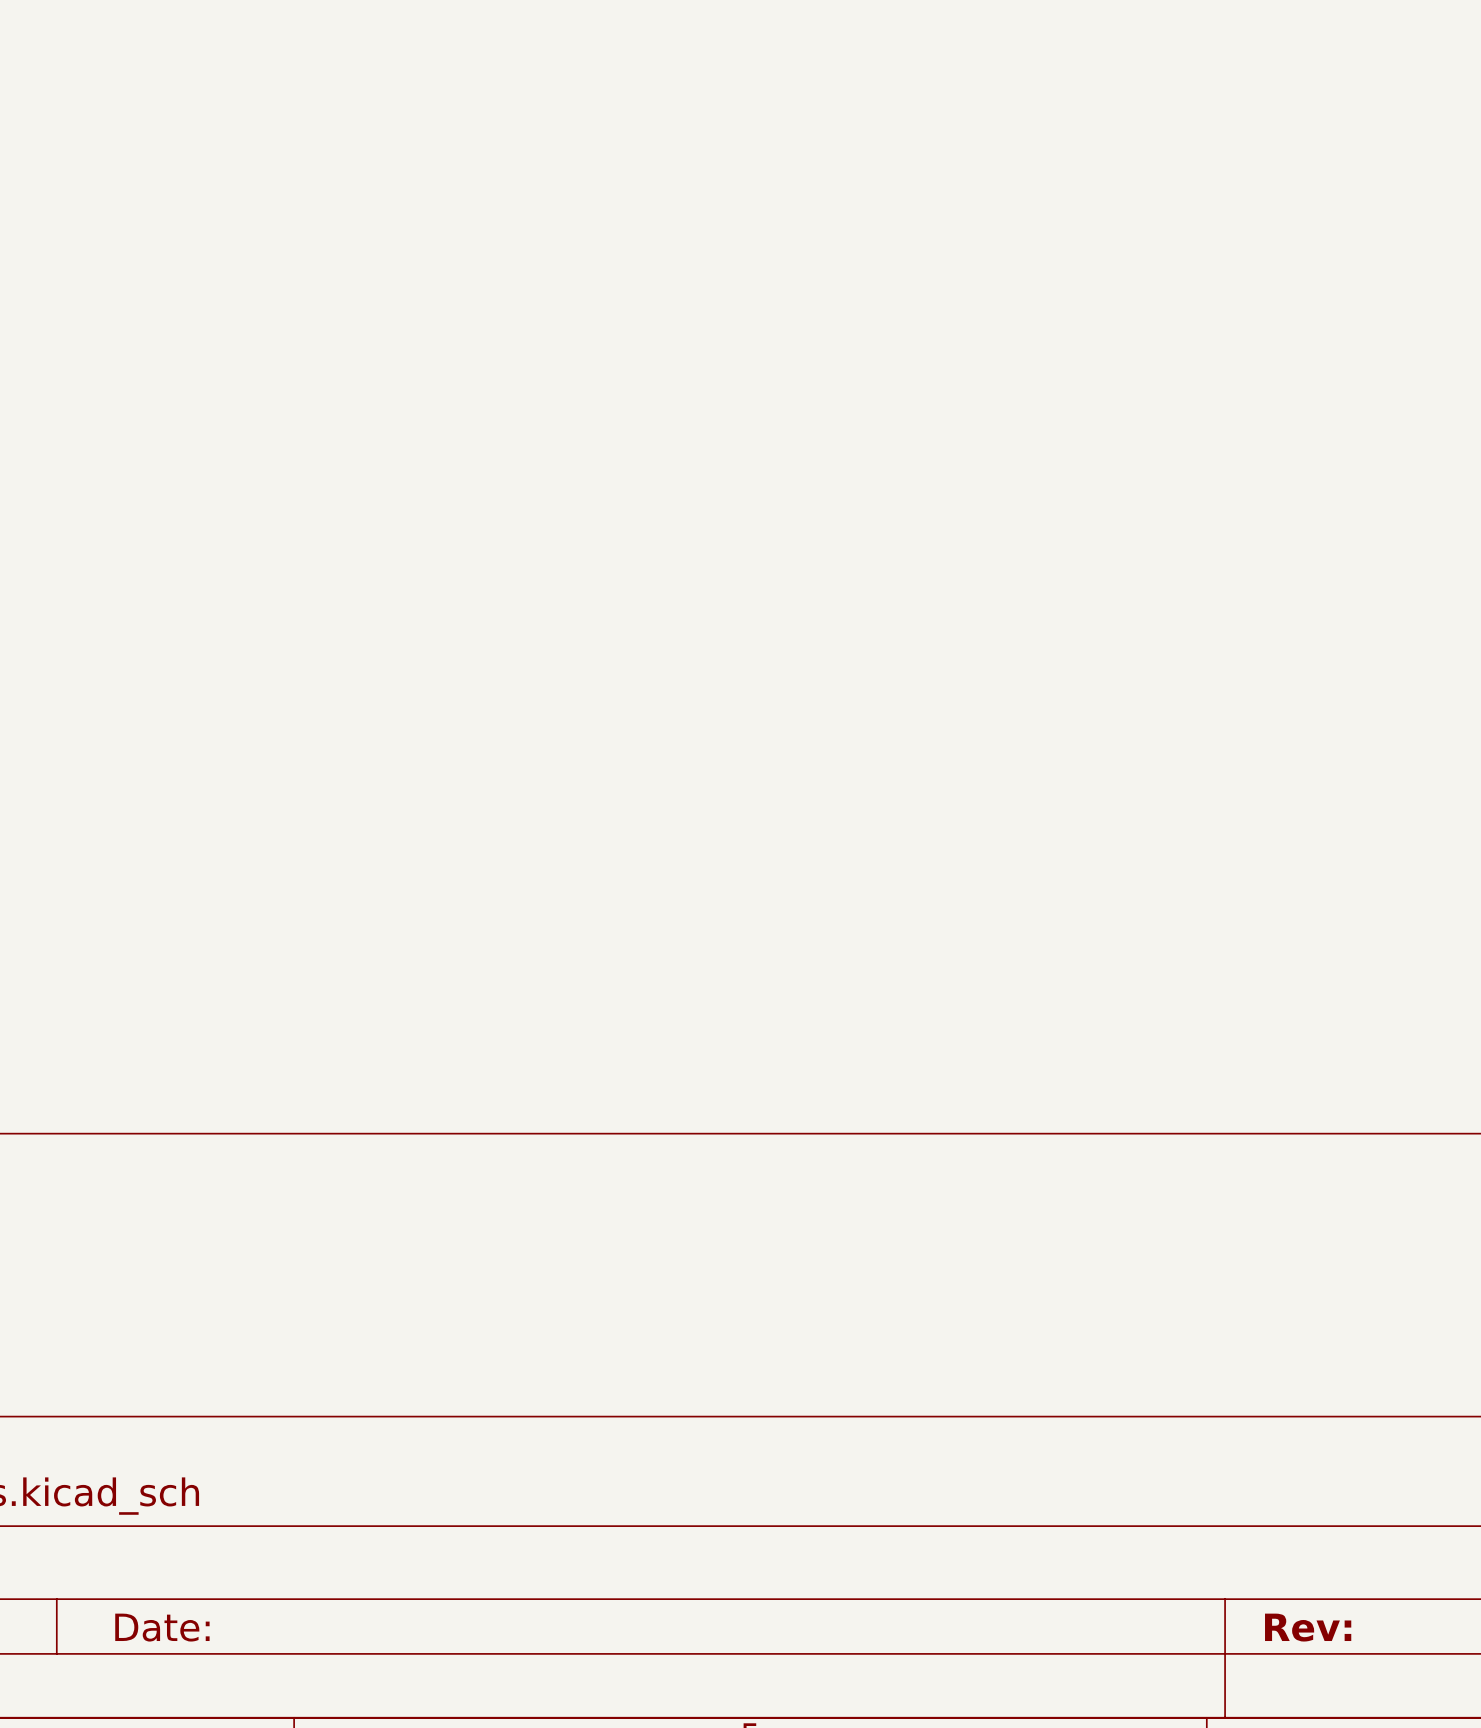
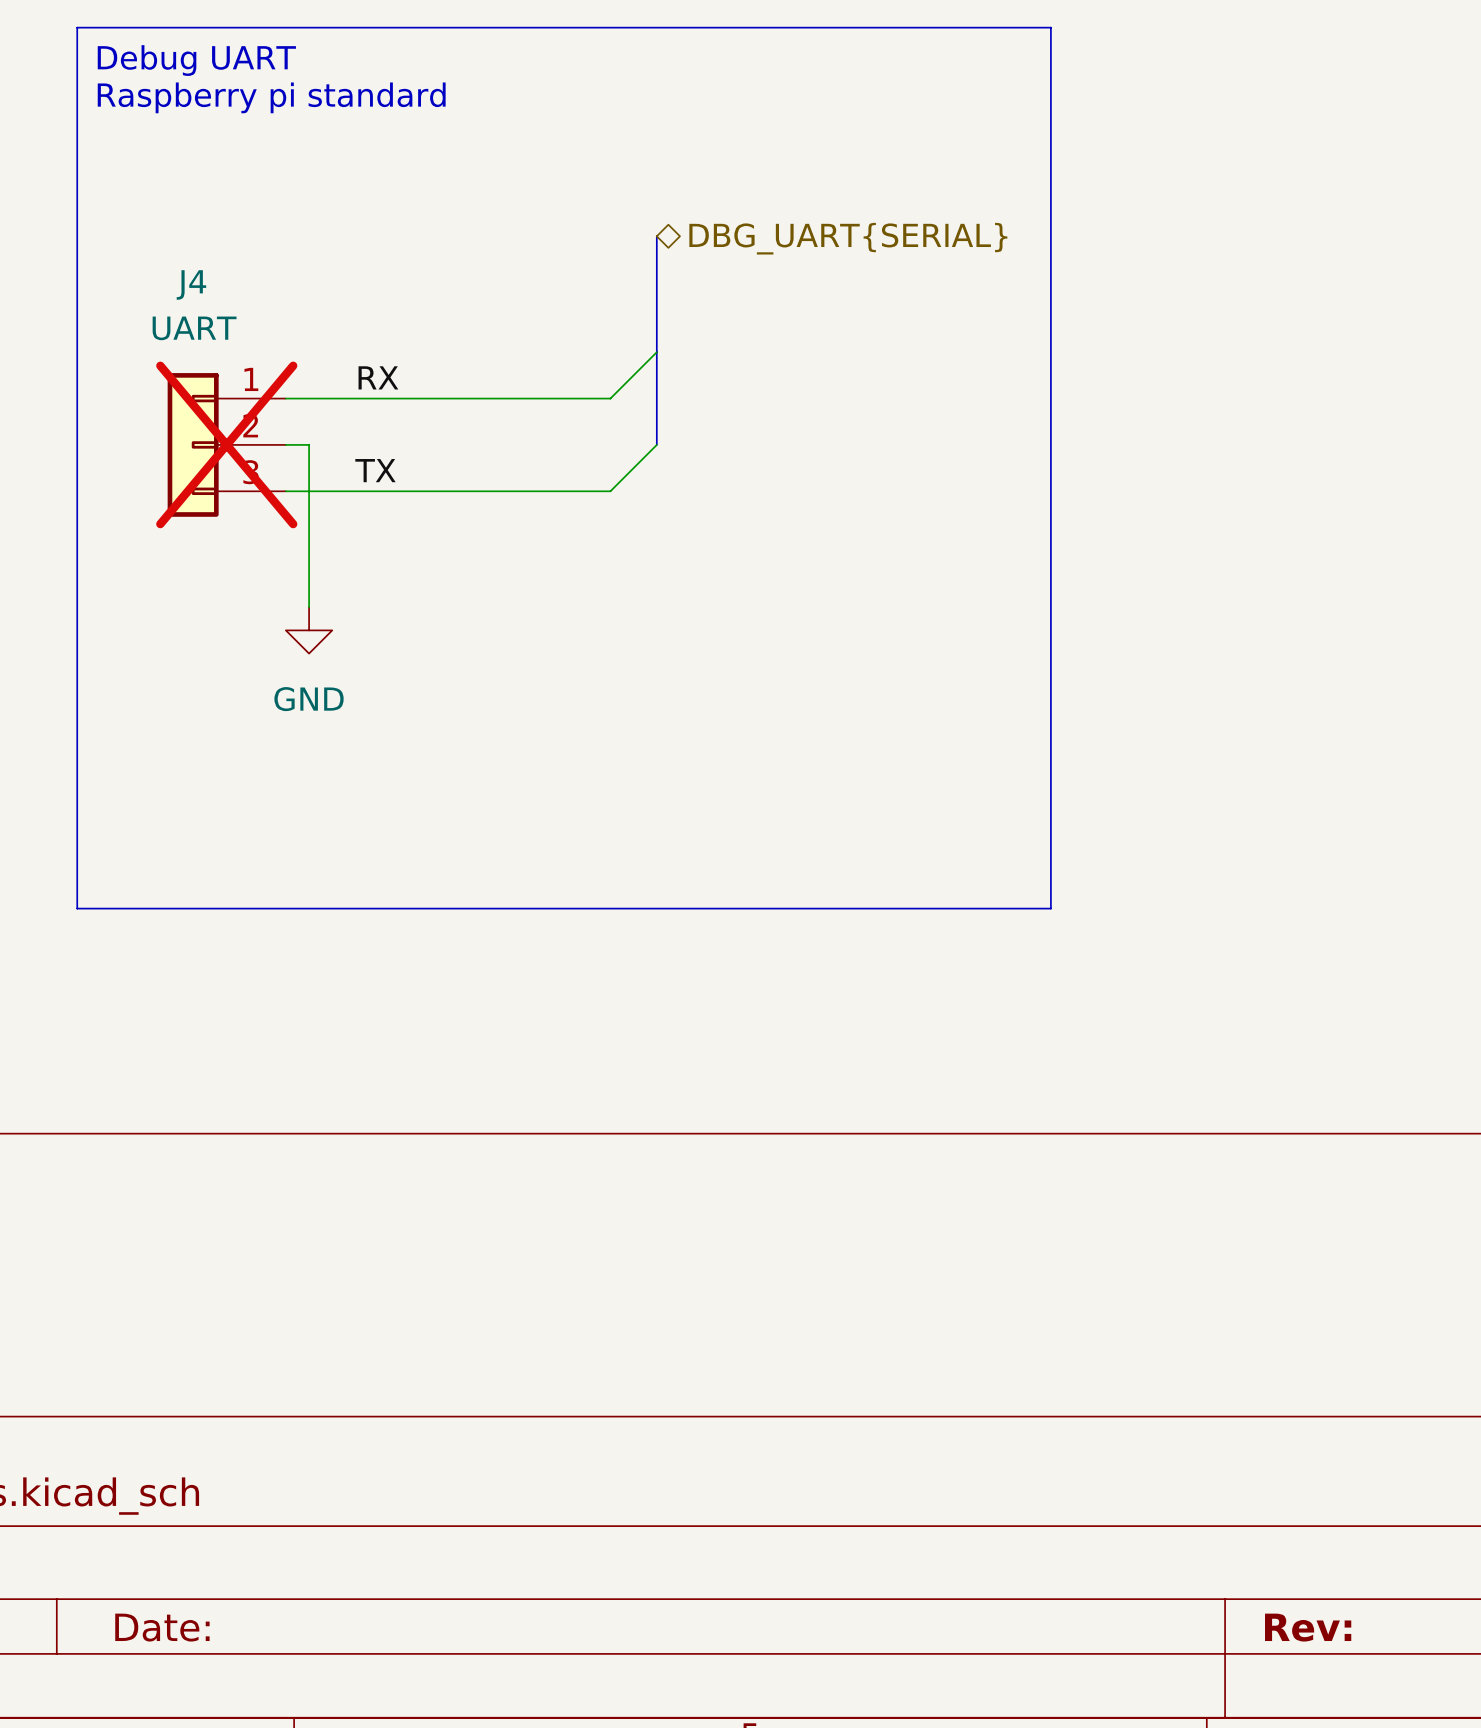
line: none -> (77, 27) (1050, 27) (1050, 908) (77, 908) (77, 27)
text: none -> Debug UART (196, 60)
text: none -> Raspberry pi standard (271, 97)
bus: none -> (656, 236) (656, 444)
hierarchical label: none -> DBG_UART{SERIAL} (848, 238)
wire: none -> (656, 352) (610, 398) (285, 398)
label: none -> RX (378, 377)
J4: none -> UART (226, 444)
wire: none -> (285, 444) (309, 444) (309, 607)
wire: none -> (656, 444) (610, 491) (285, 491)
label: none -> TX (375, 470)
power symbol: none -> GND (309, 630)

